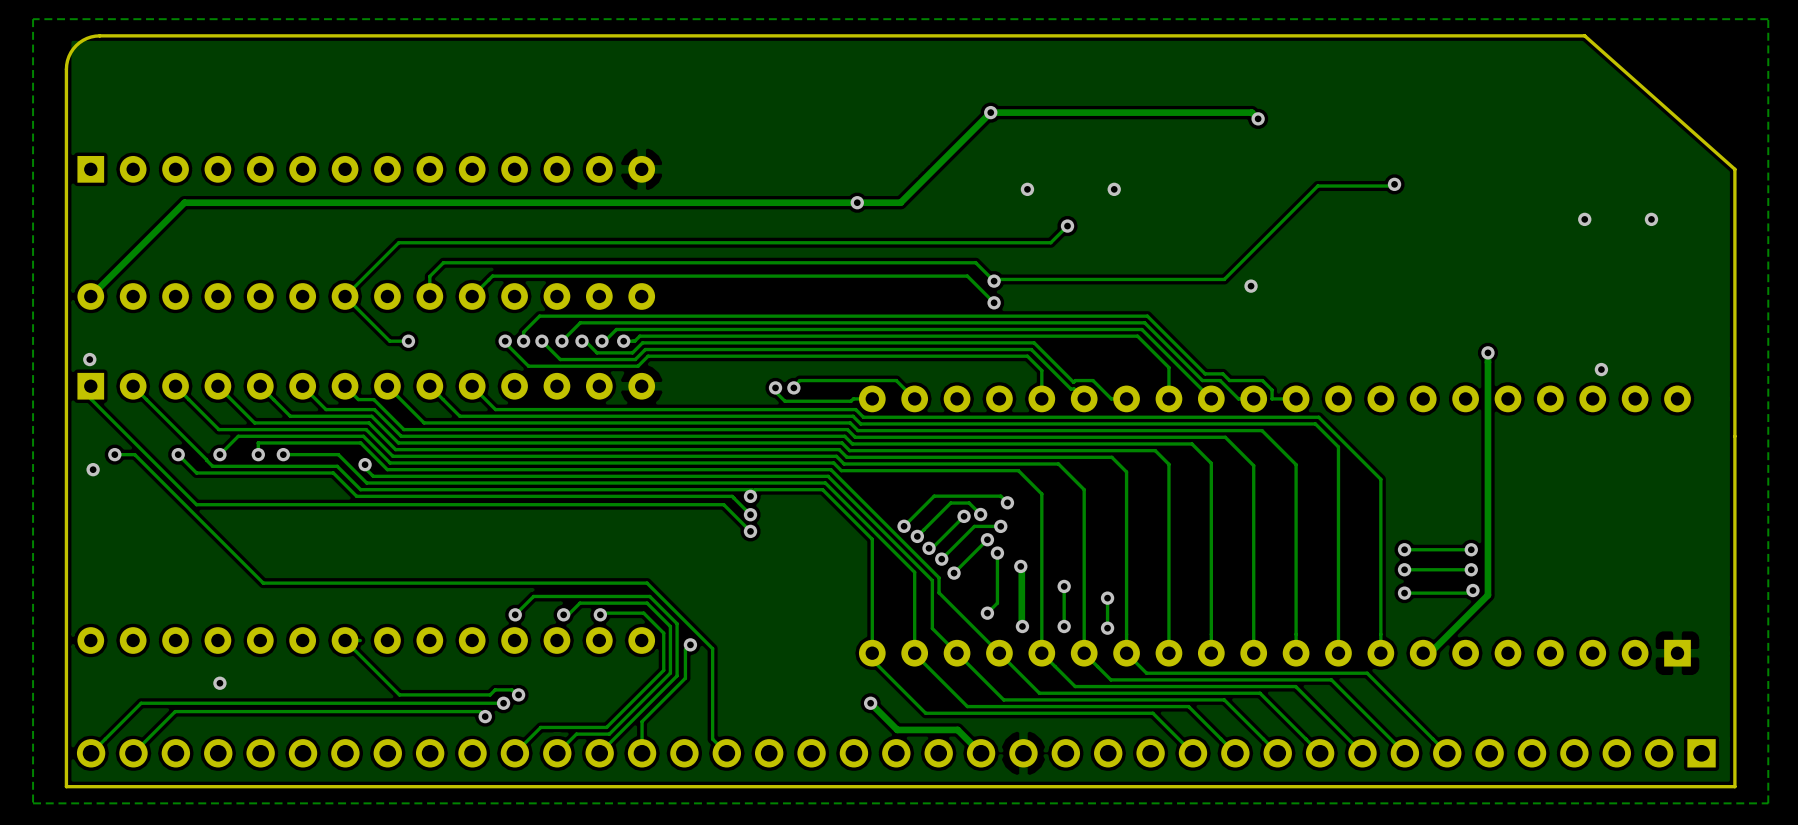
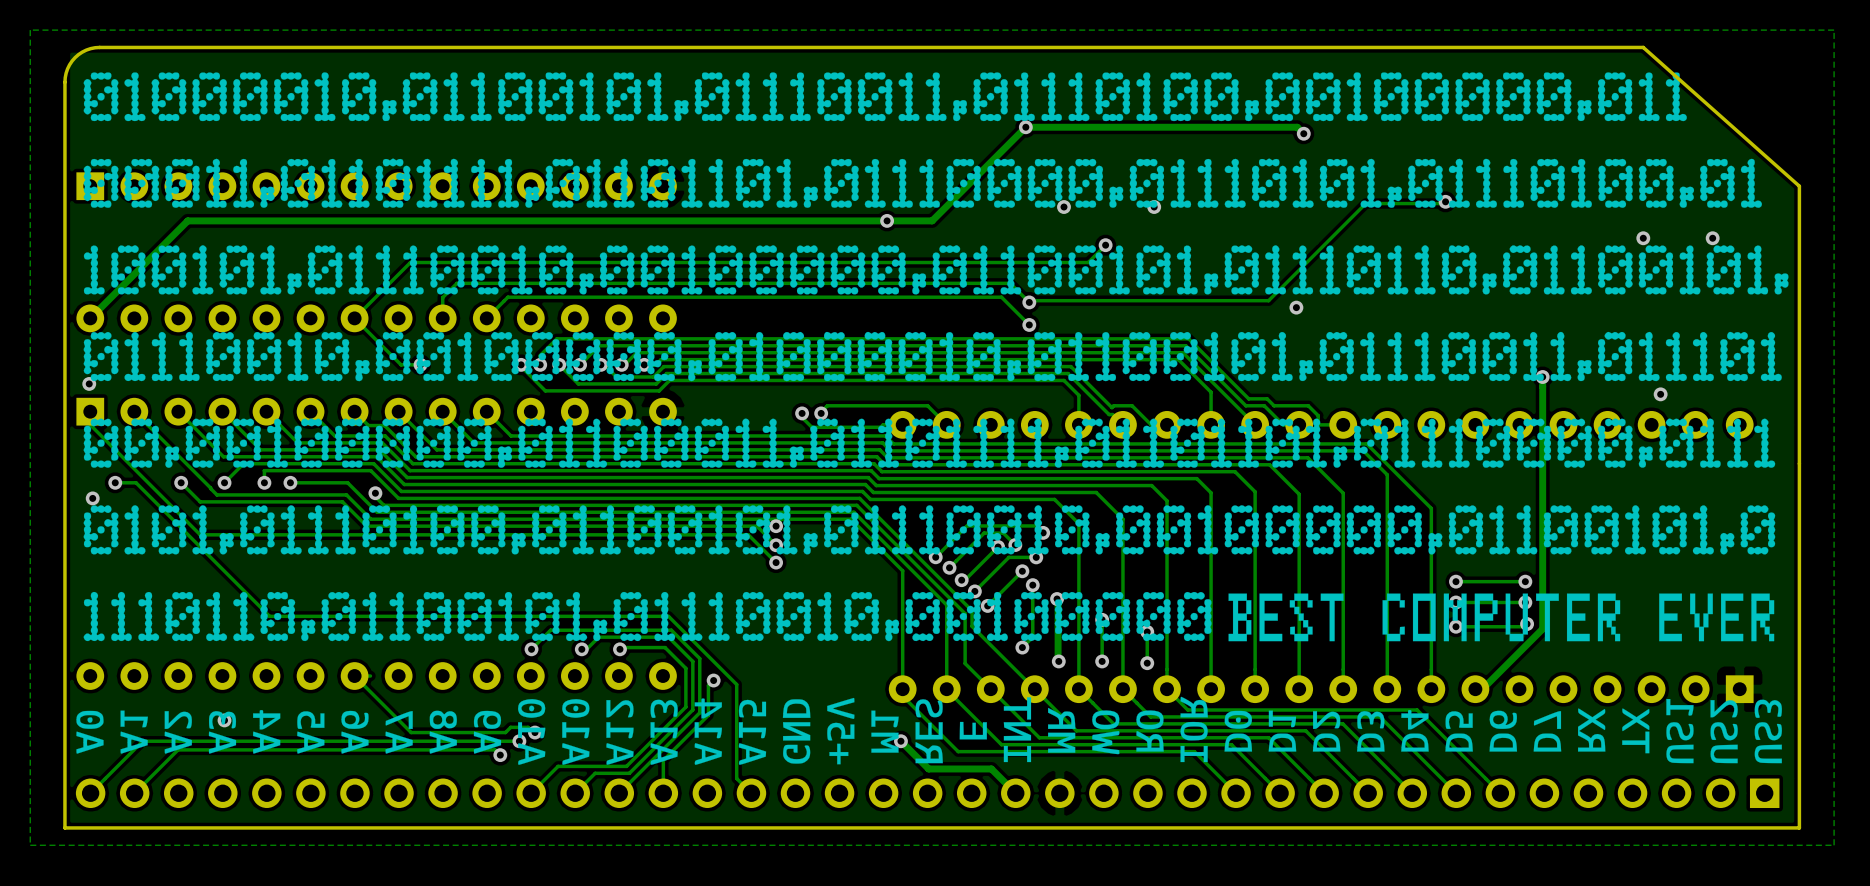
drawing: none -> [76, 72, 1789, 765]

